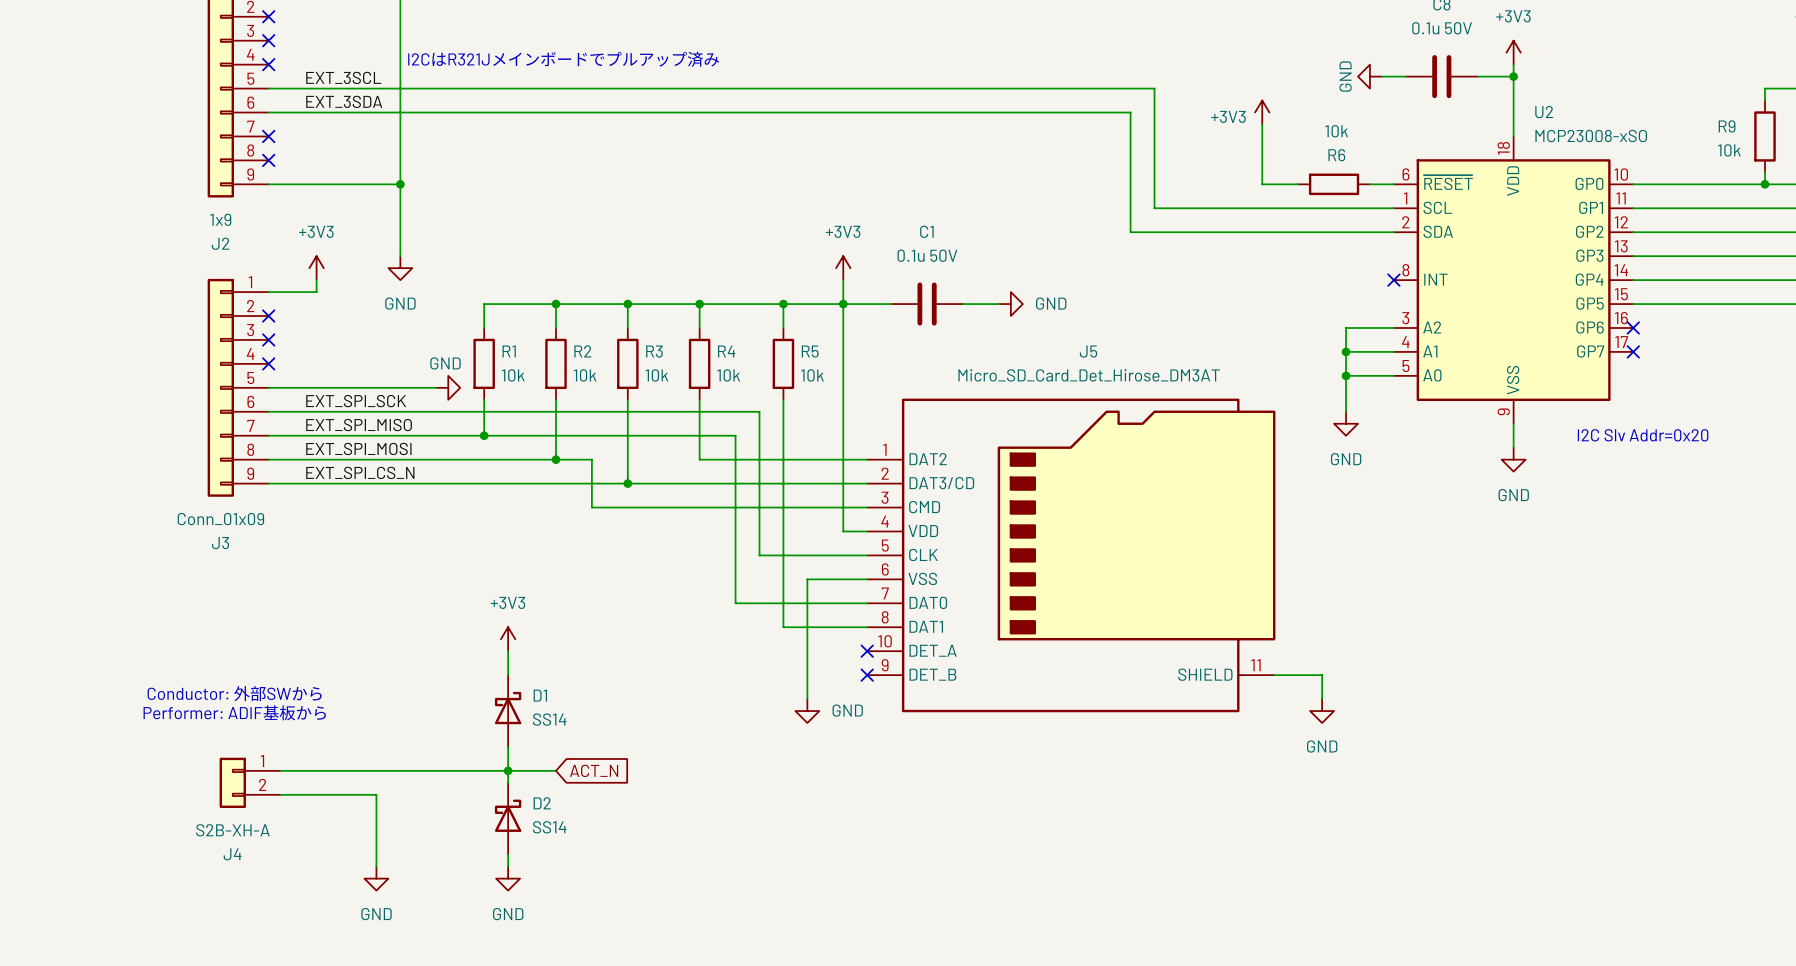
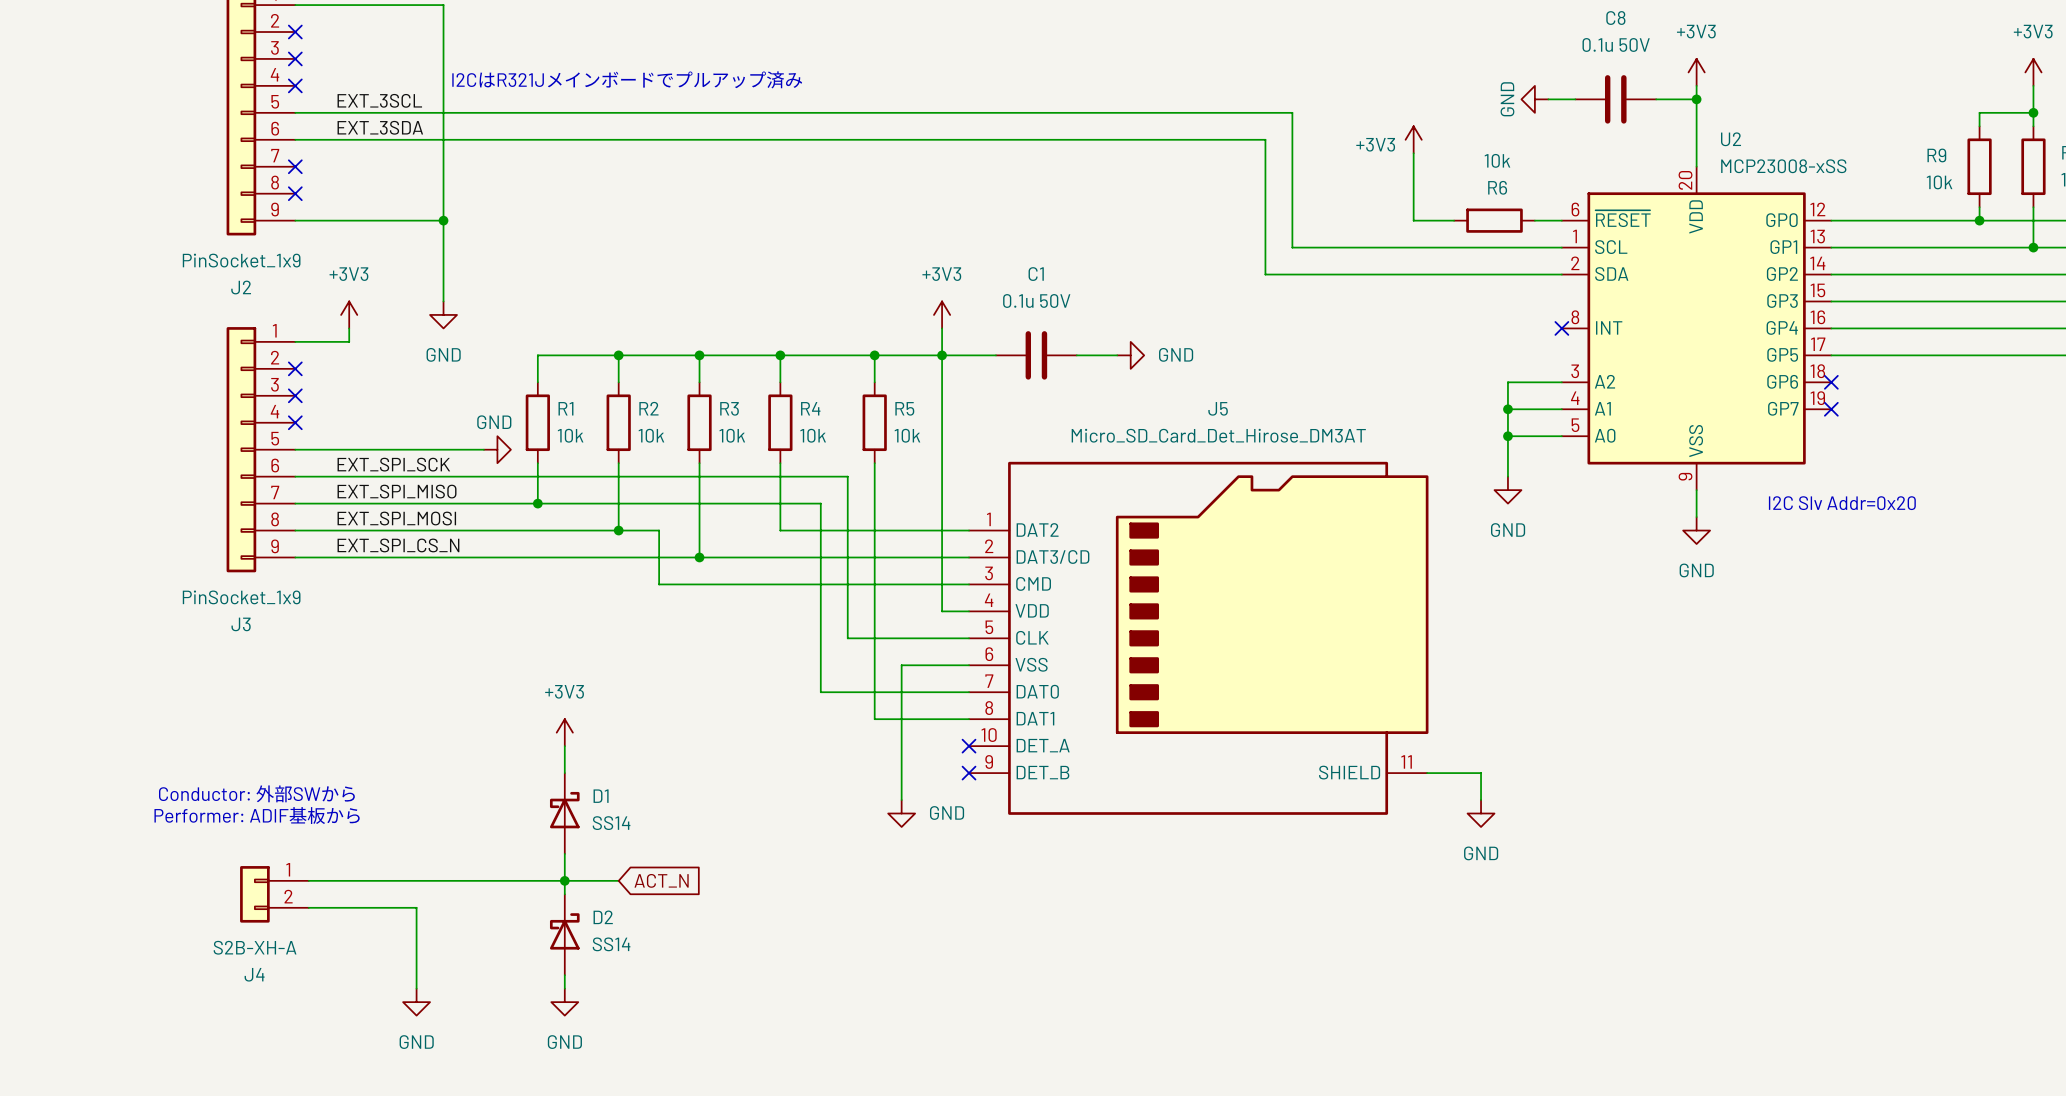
U2 symbol: [1393, 136, 1634, 424] -> [1561, 166, 1832, 491]
U2 value: MCP23008-xSO (1591, 136) -> MCP23008-xSS (1783, 166)
J2 value: 1x9 (220, 219) -> PinSocket_1x9 (241, 260)
J3 value: Conn_01x09 (220, 519) -> PinSocket_1x9 (241, 597)

